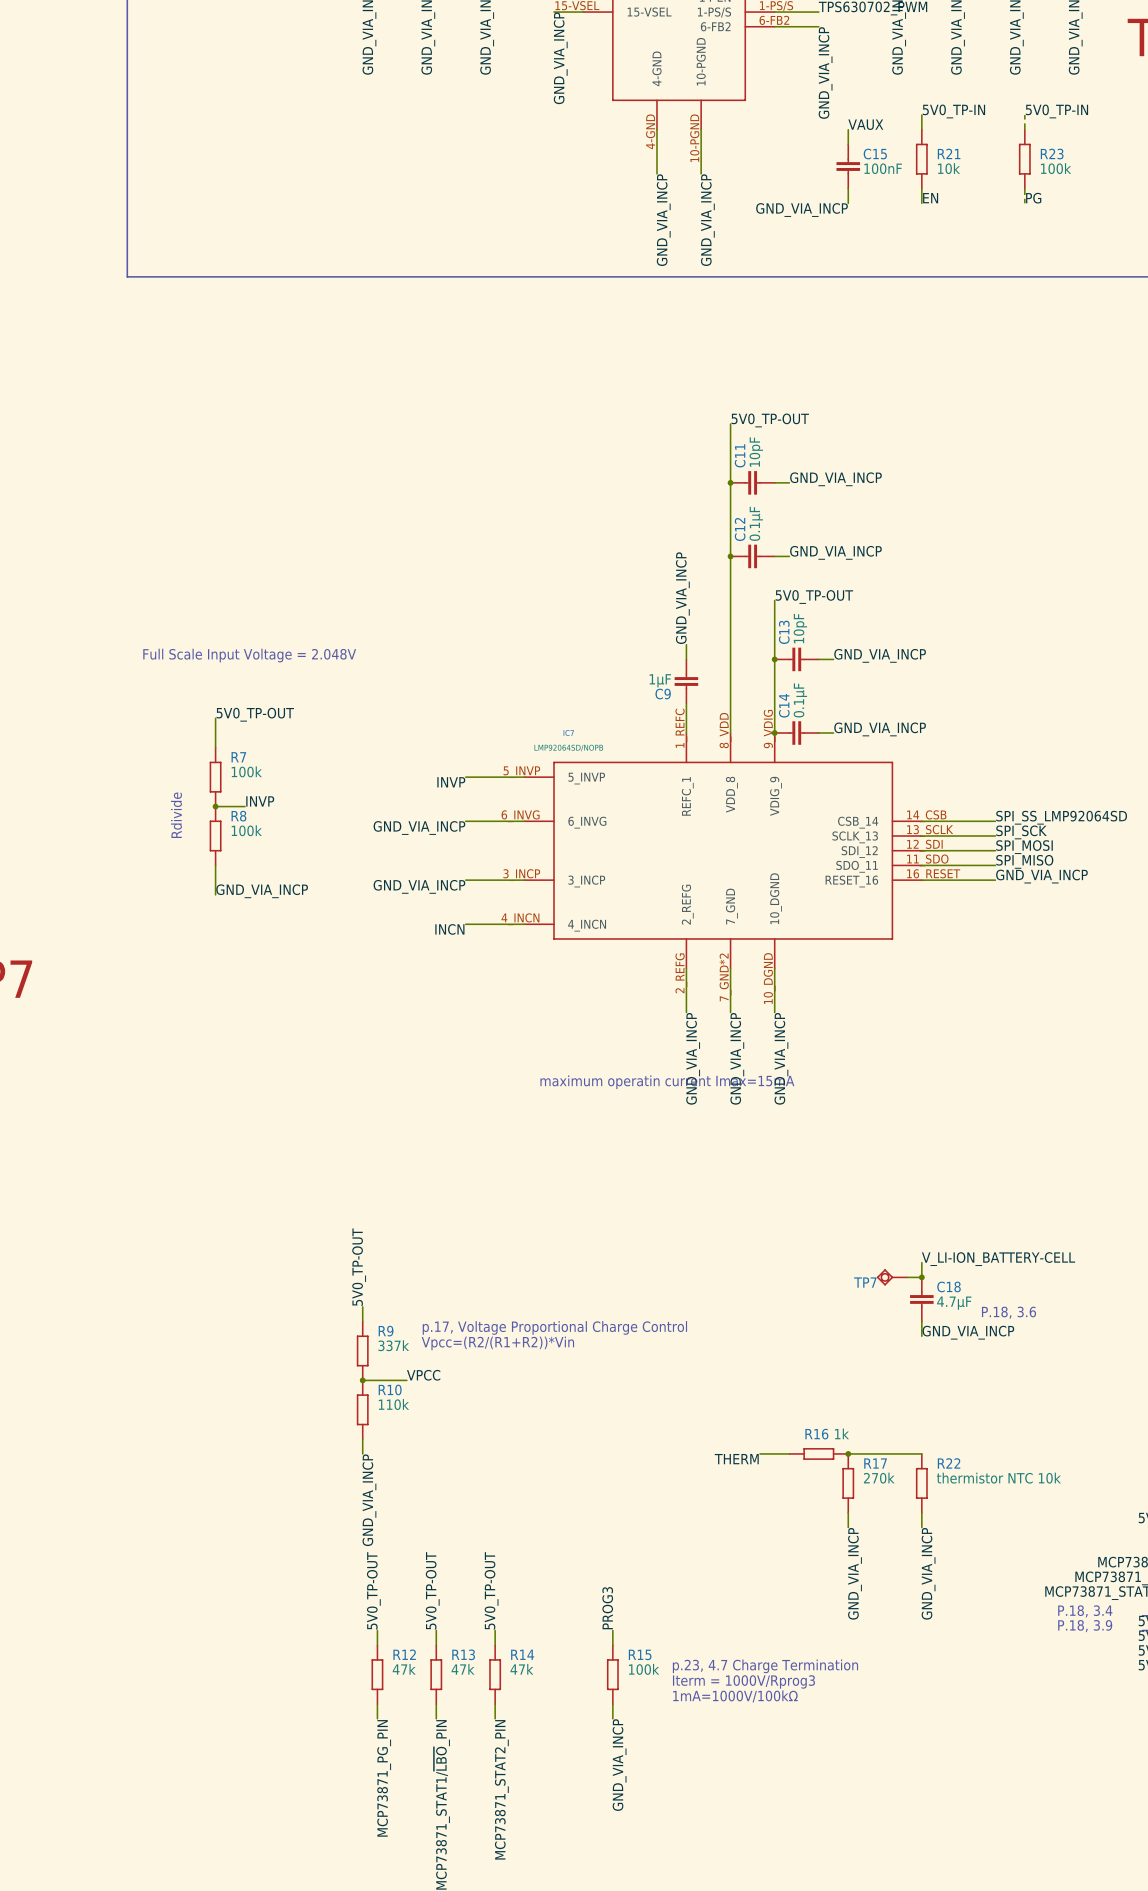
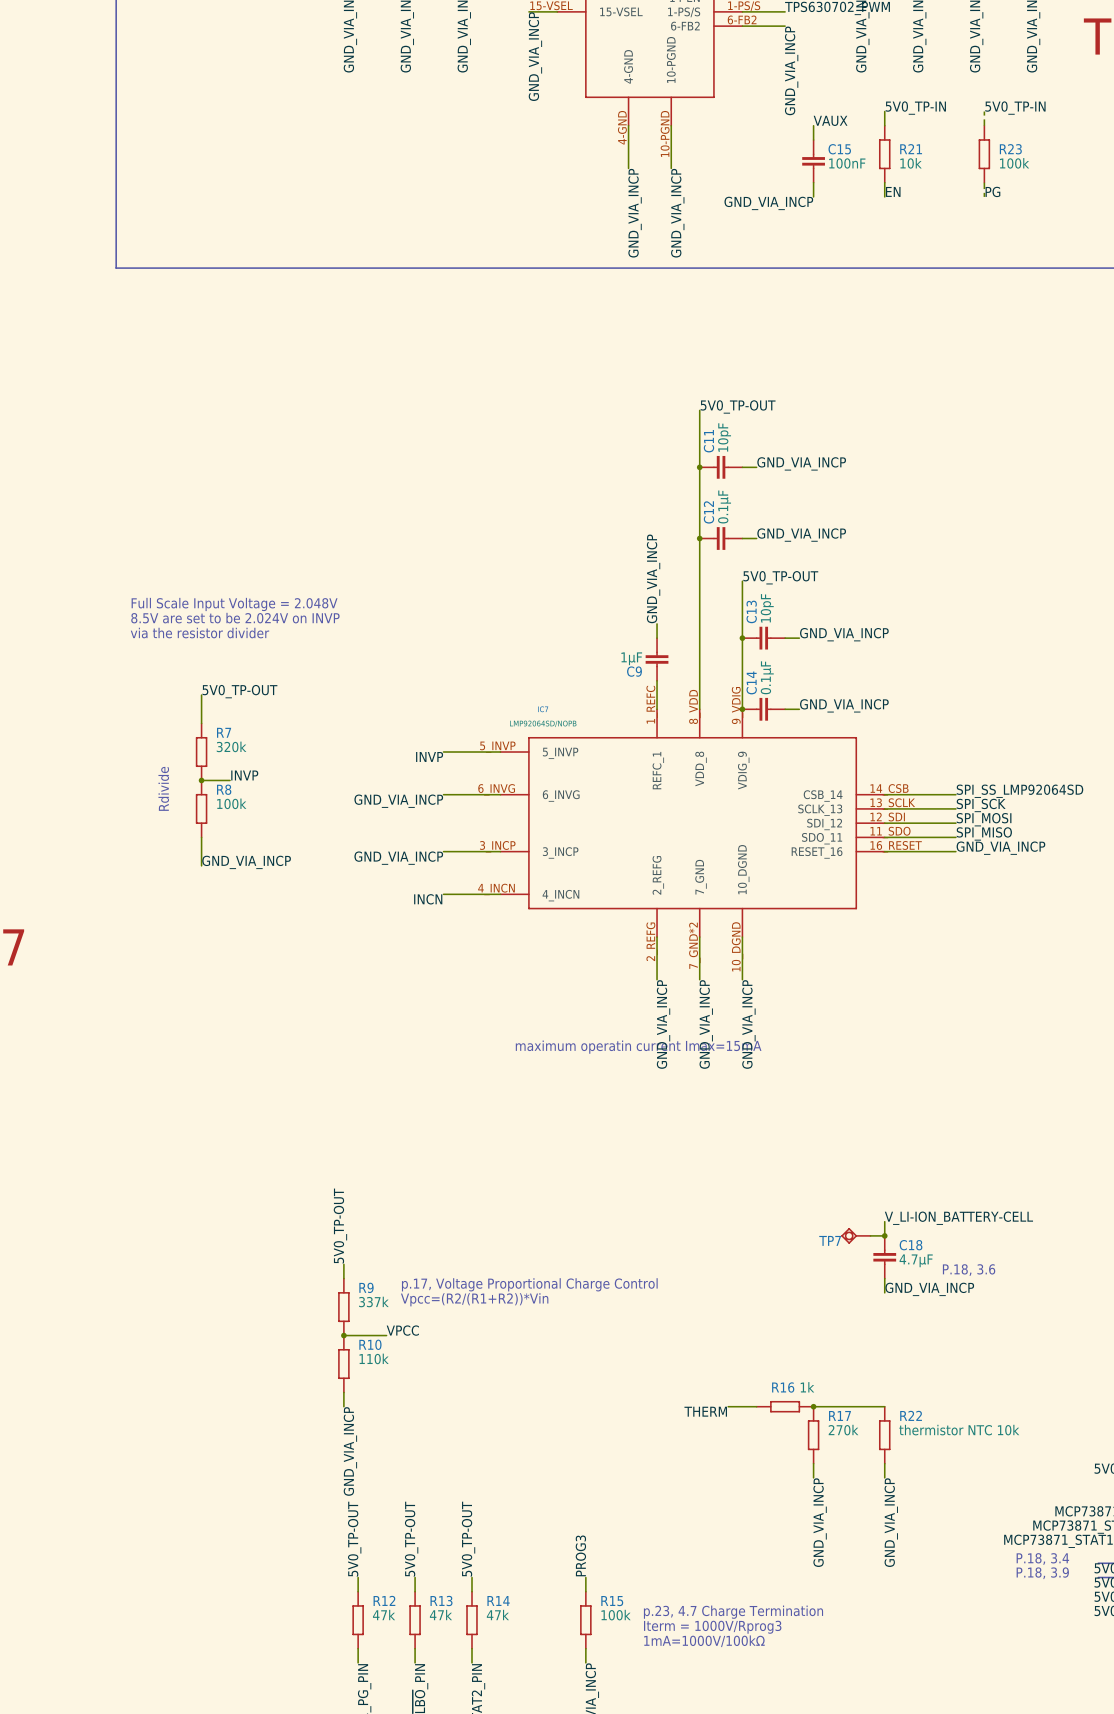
text: none -> Full Scale Input Voltage = 2.048V (234, 604)
text: none -> 8.5V are set to be 2.024V on INVP (235, 618)
text: Full Scale Input Voltage = 2.048V (249, 655) -> via the resistor divider (199, 633)
R7 value: 100k (246, 771) -> 320k (231, 746)

